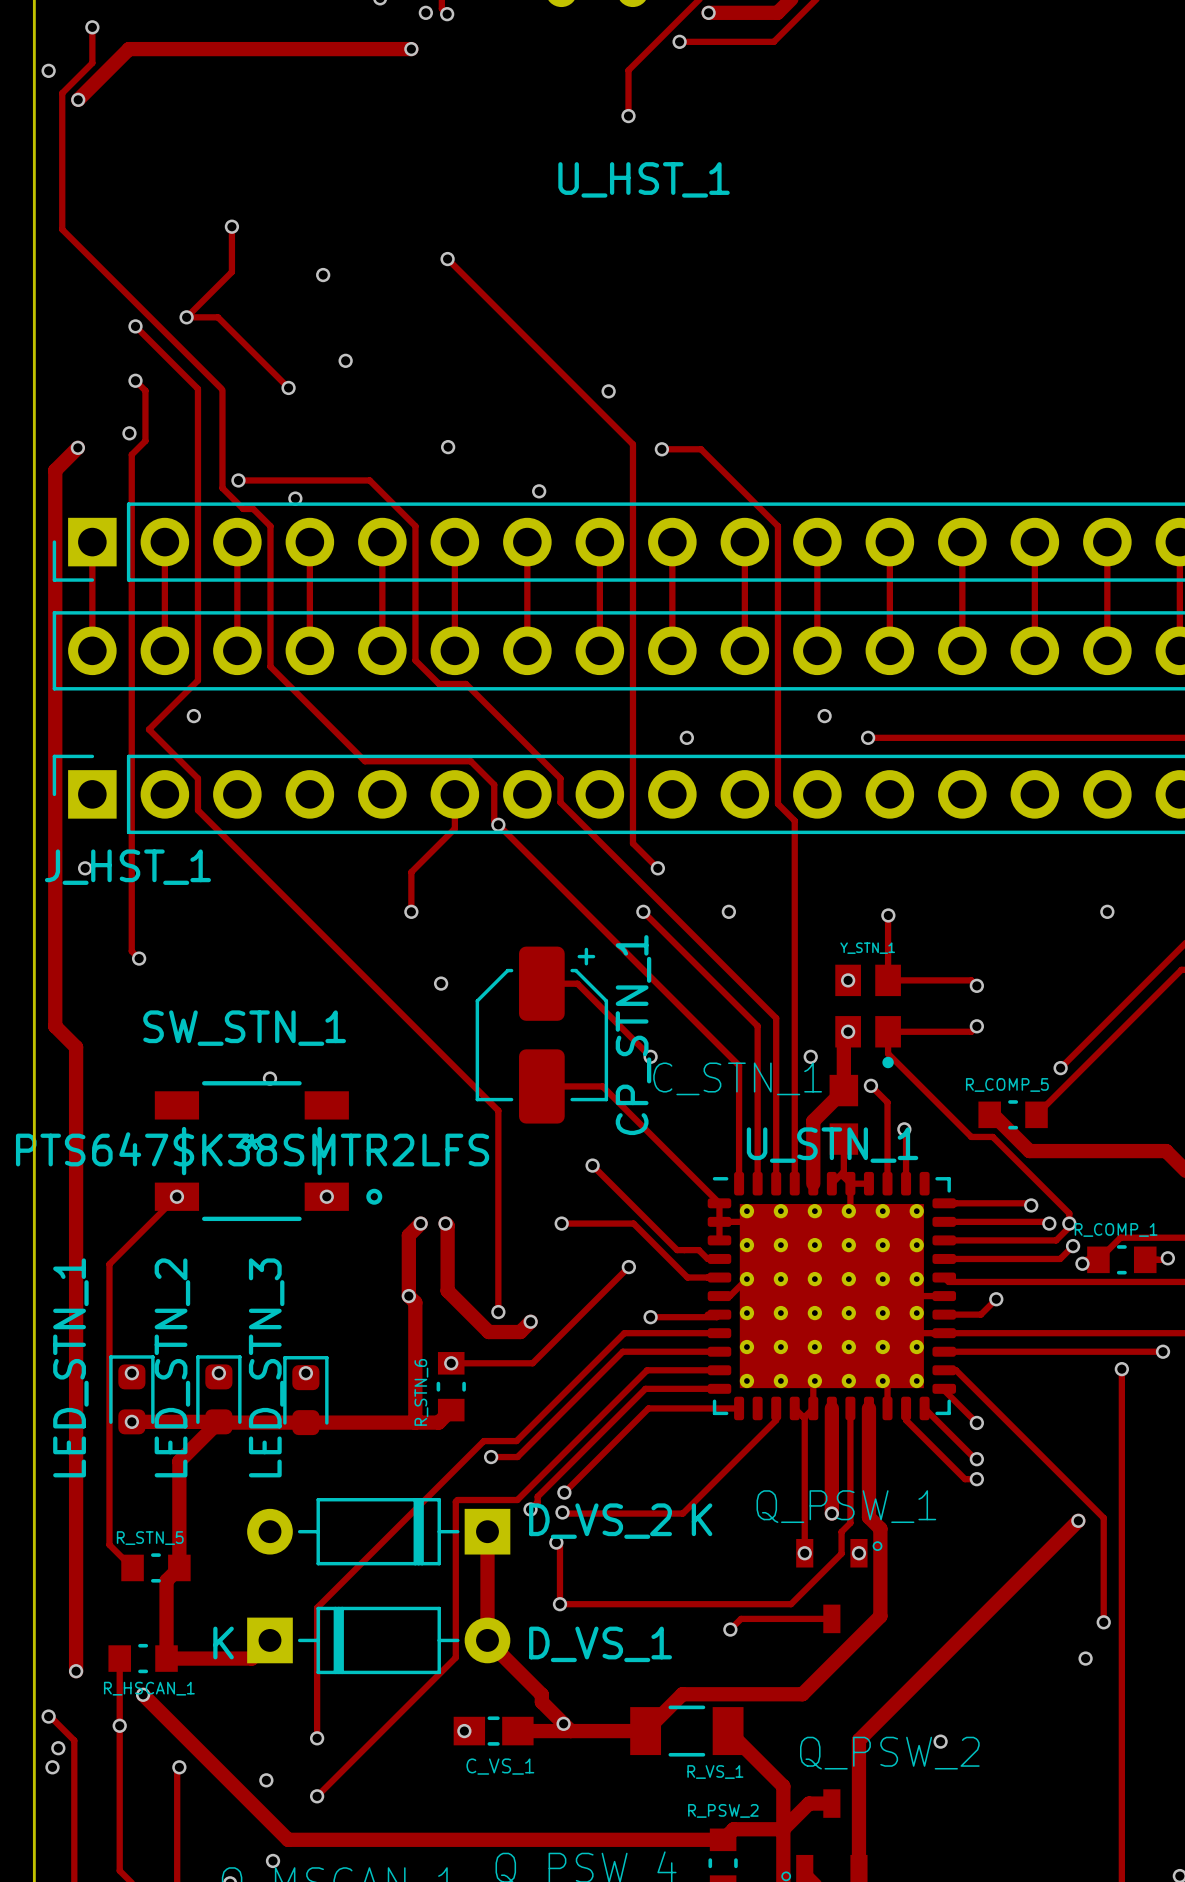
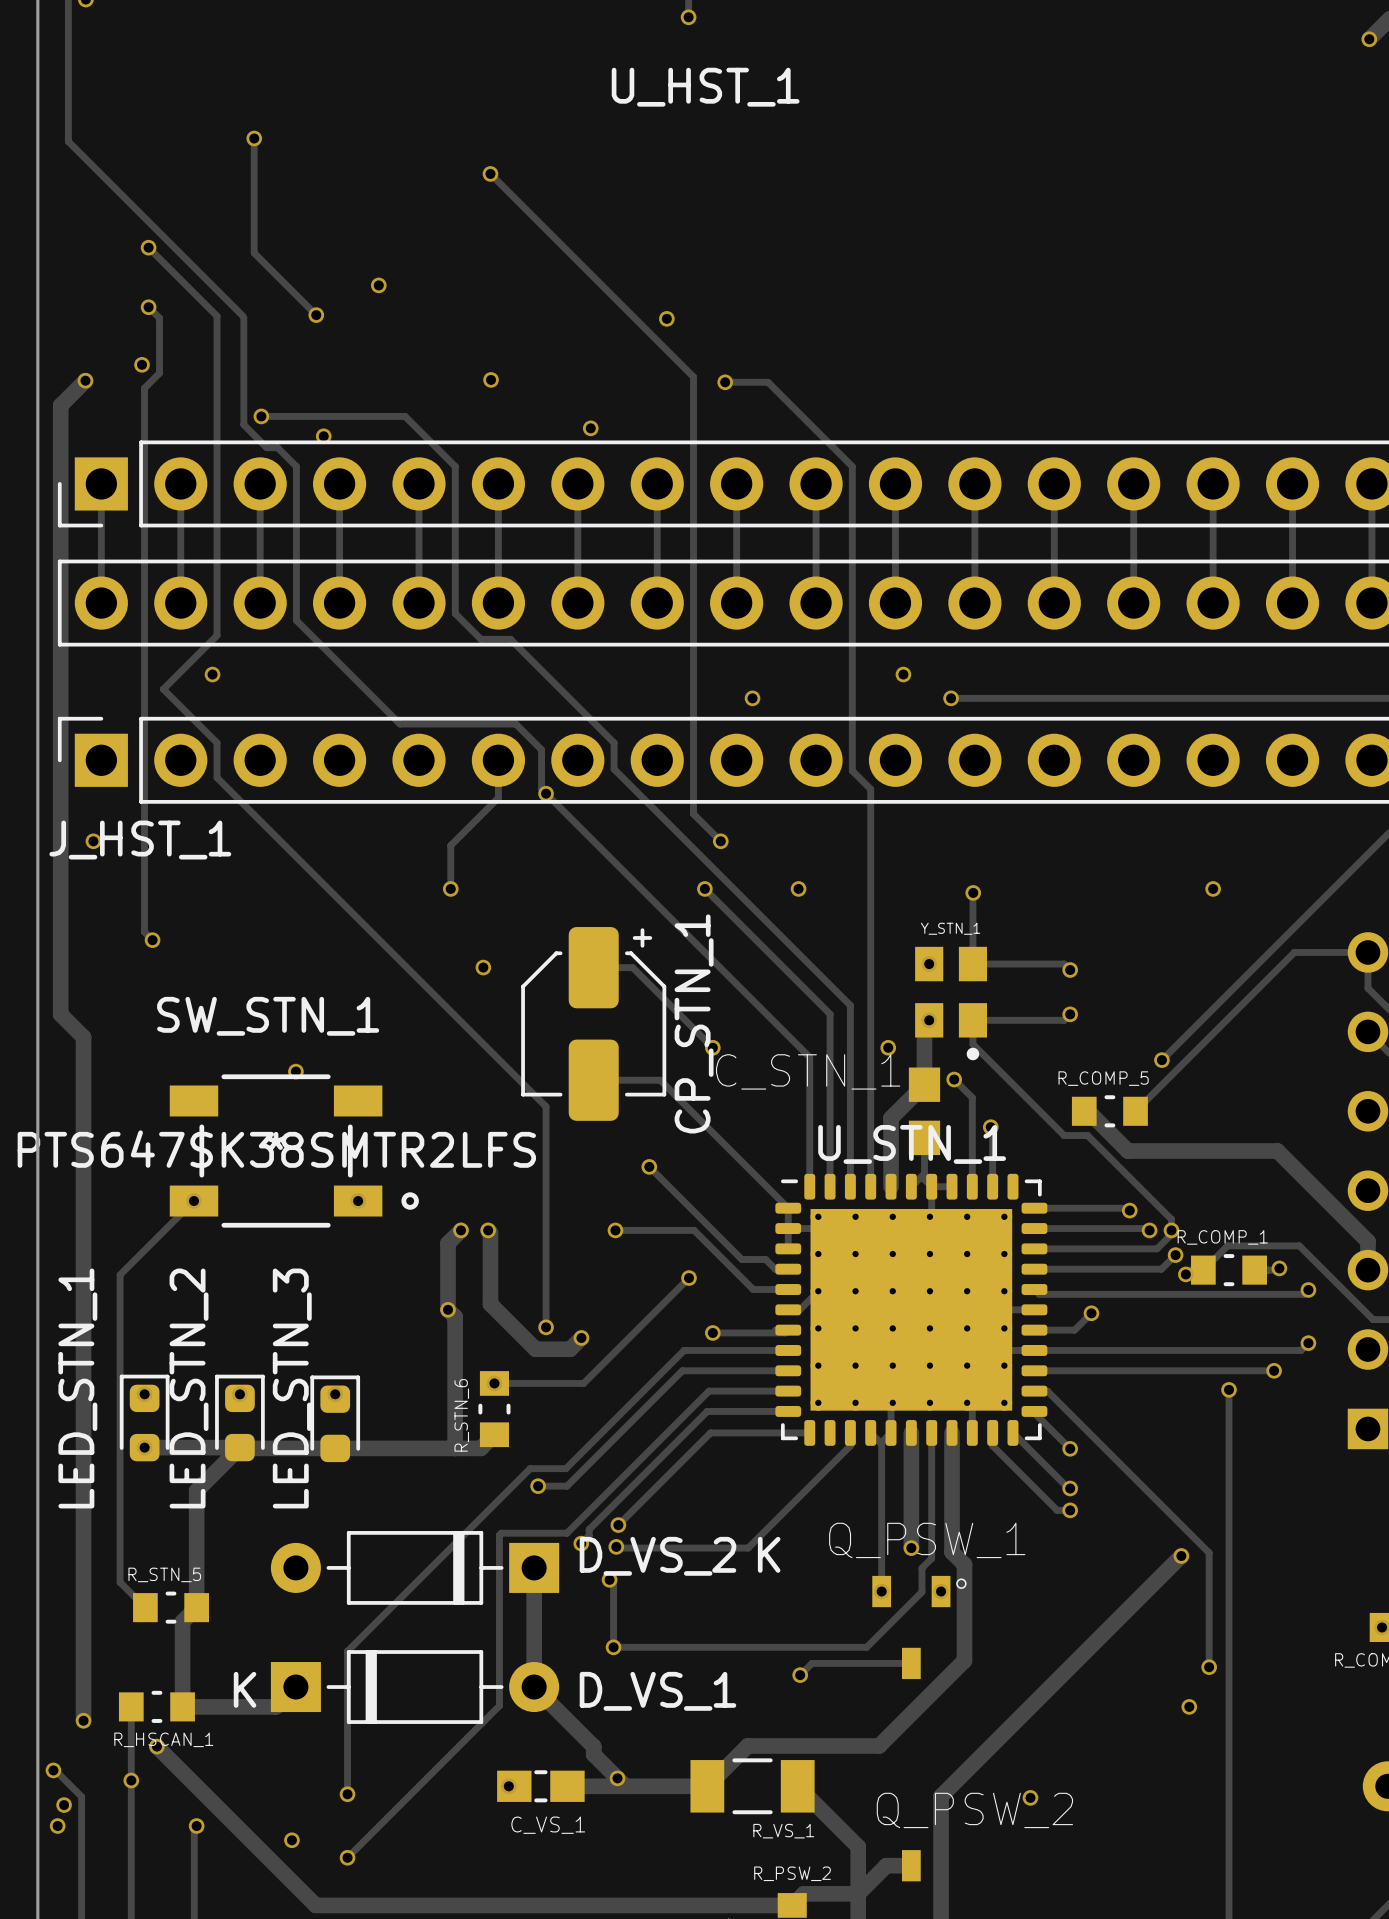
track: (231, 272) (186, 317) (217, 317) (231, 331) -> (254, 188) (254, 253)
via: (323, 275) -> none
via: (186, 317) -> none

